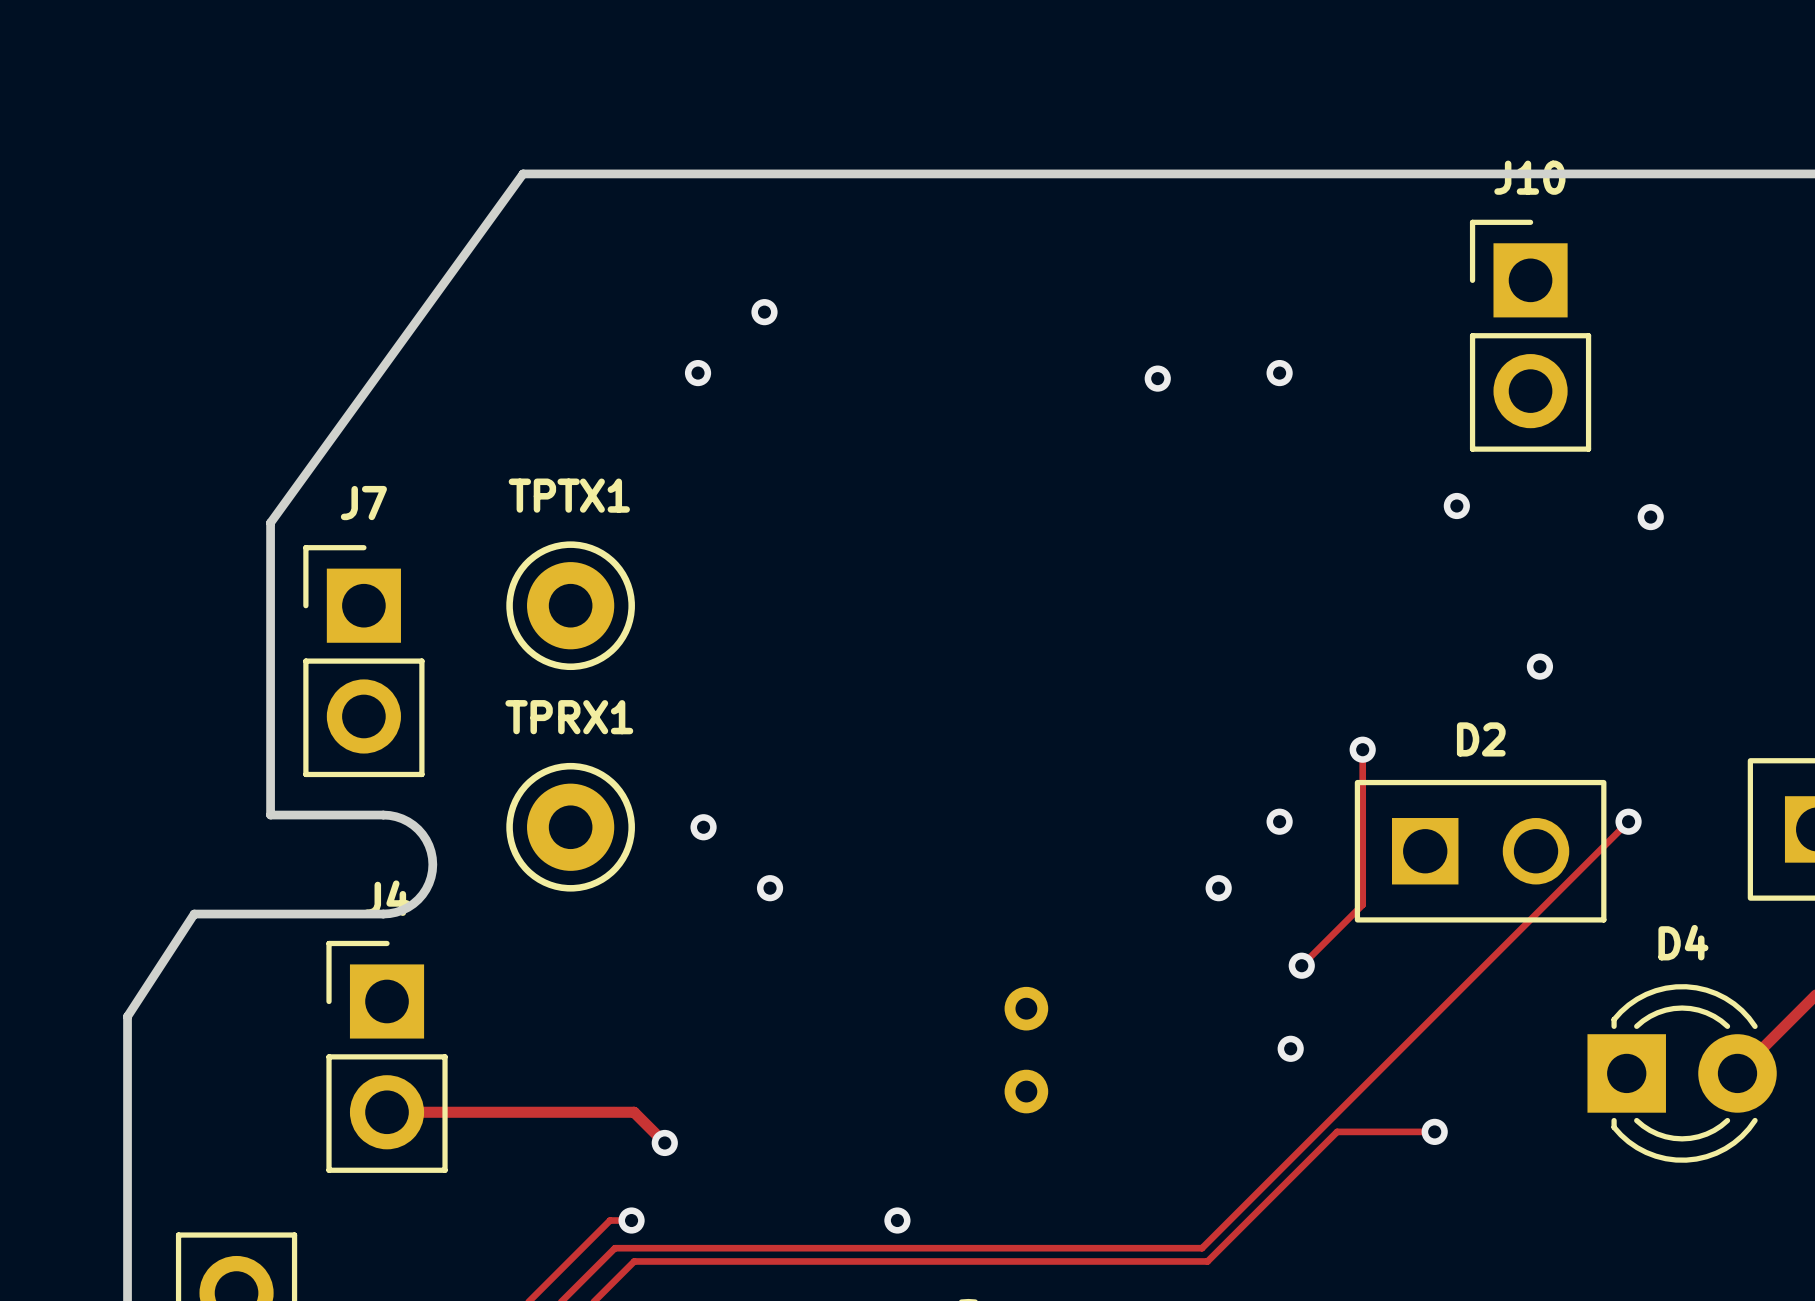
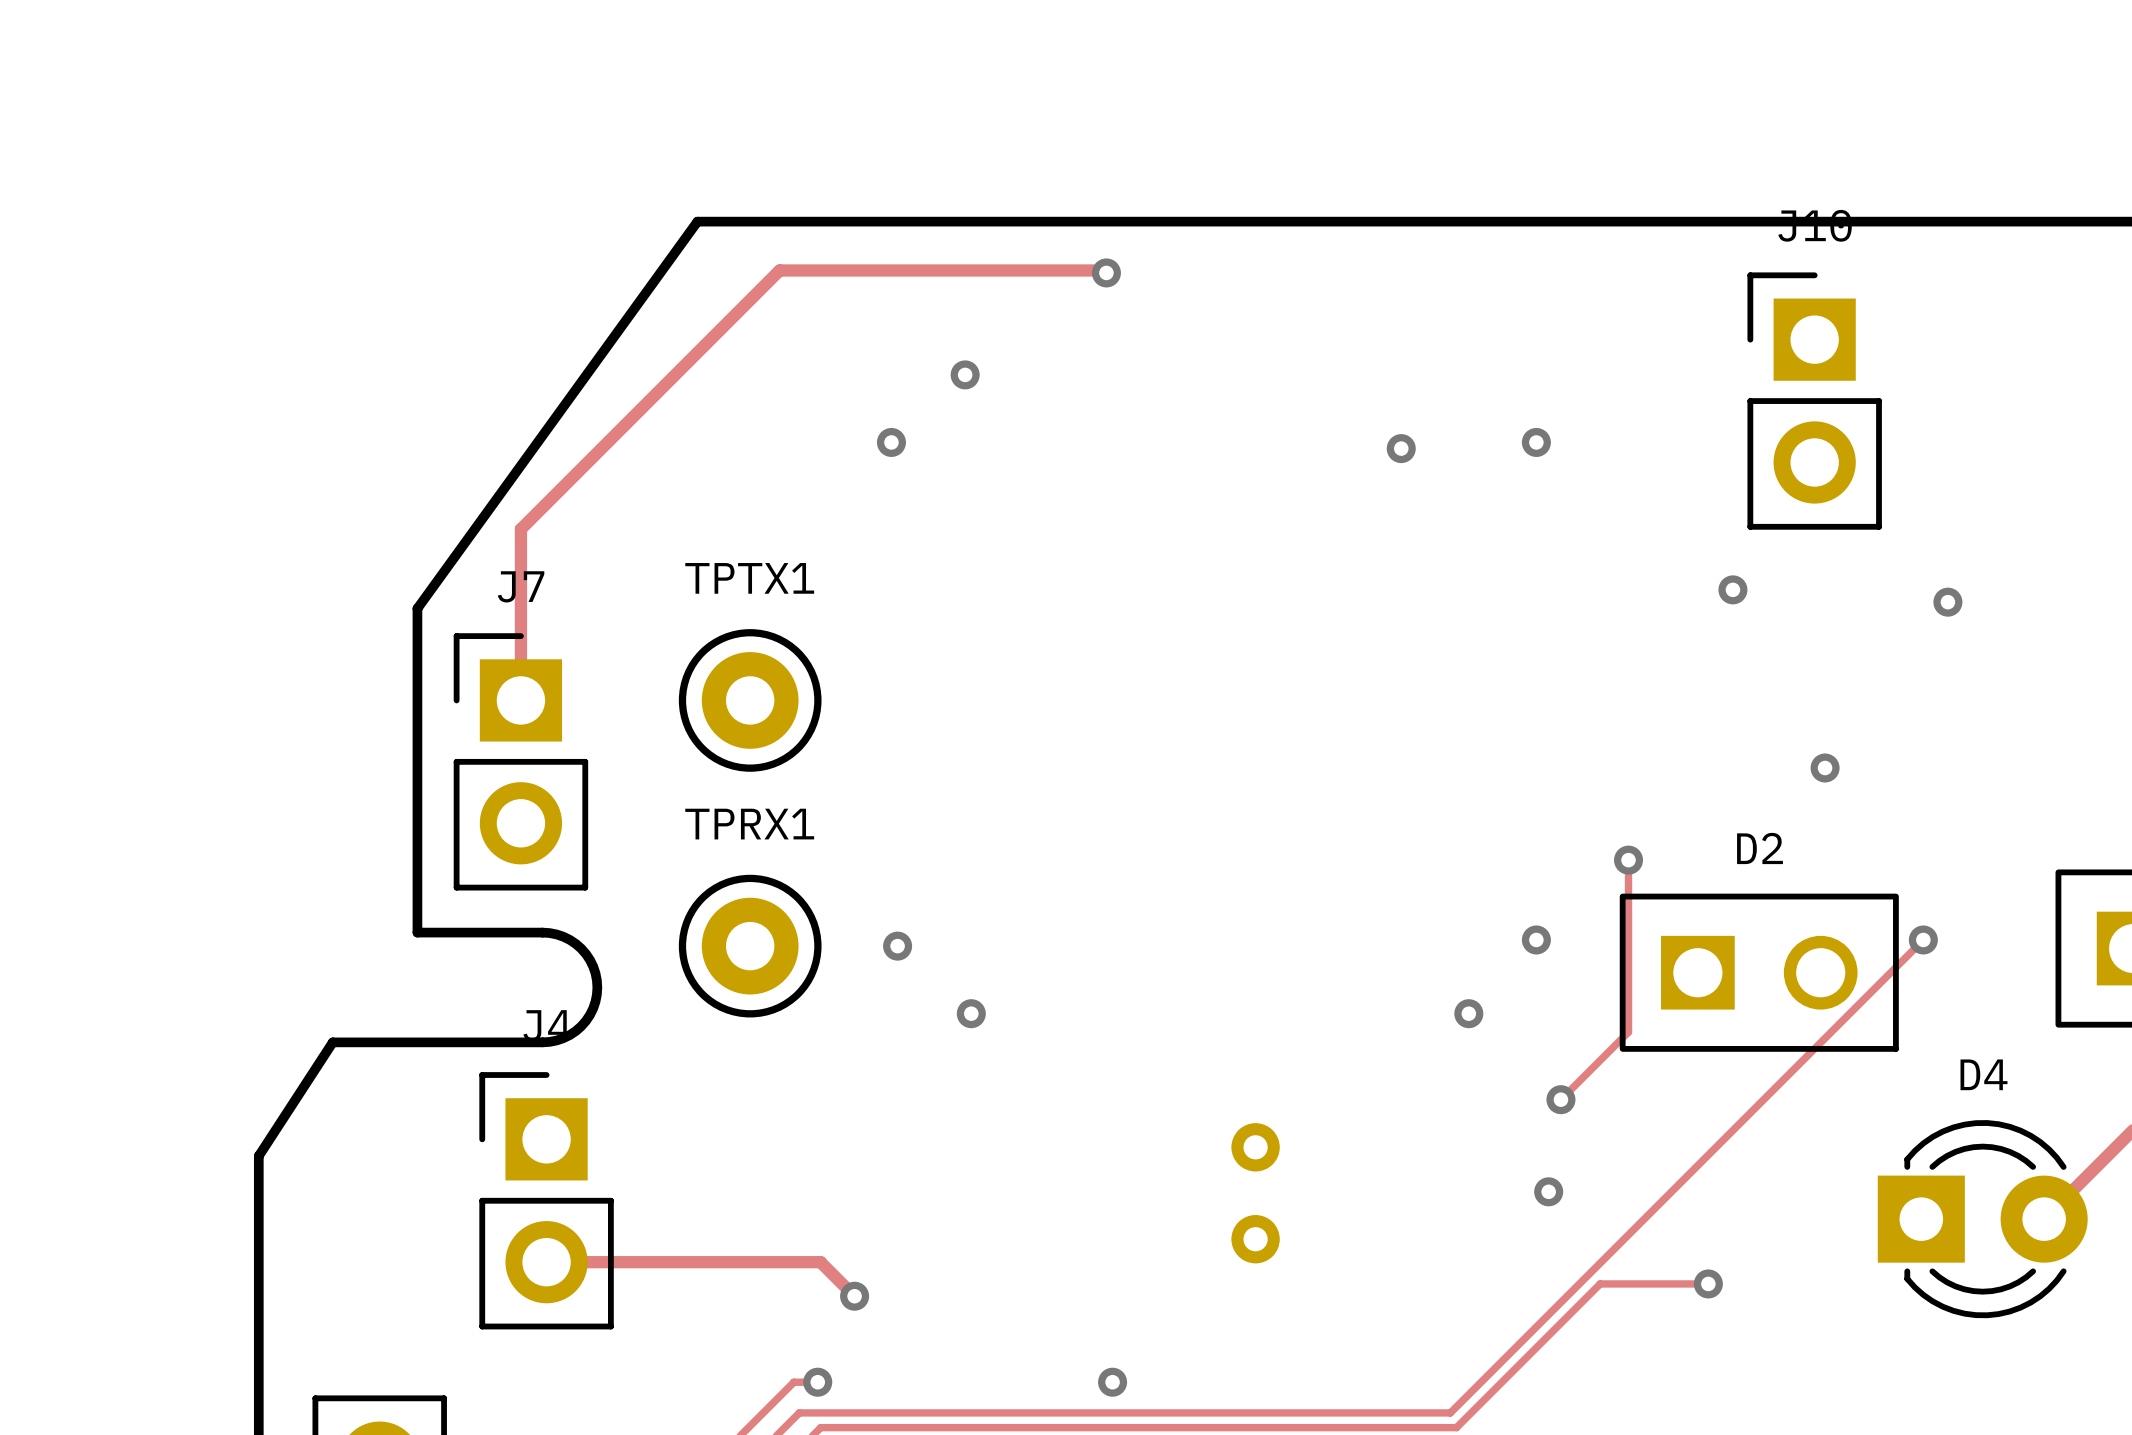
track: none -> (1106, 272) (1103, 270) (779, 270) (520, 529) (520, 700)
via: none -> (1106, 272)

